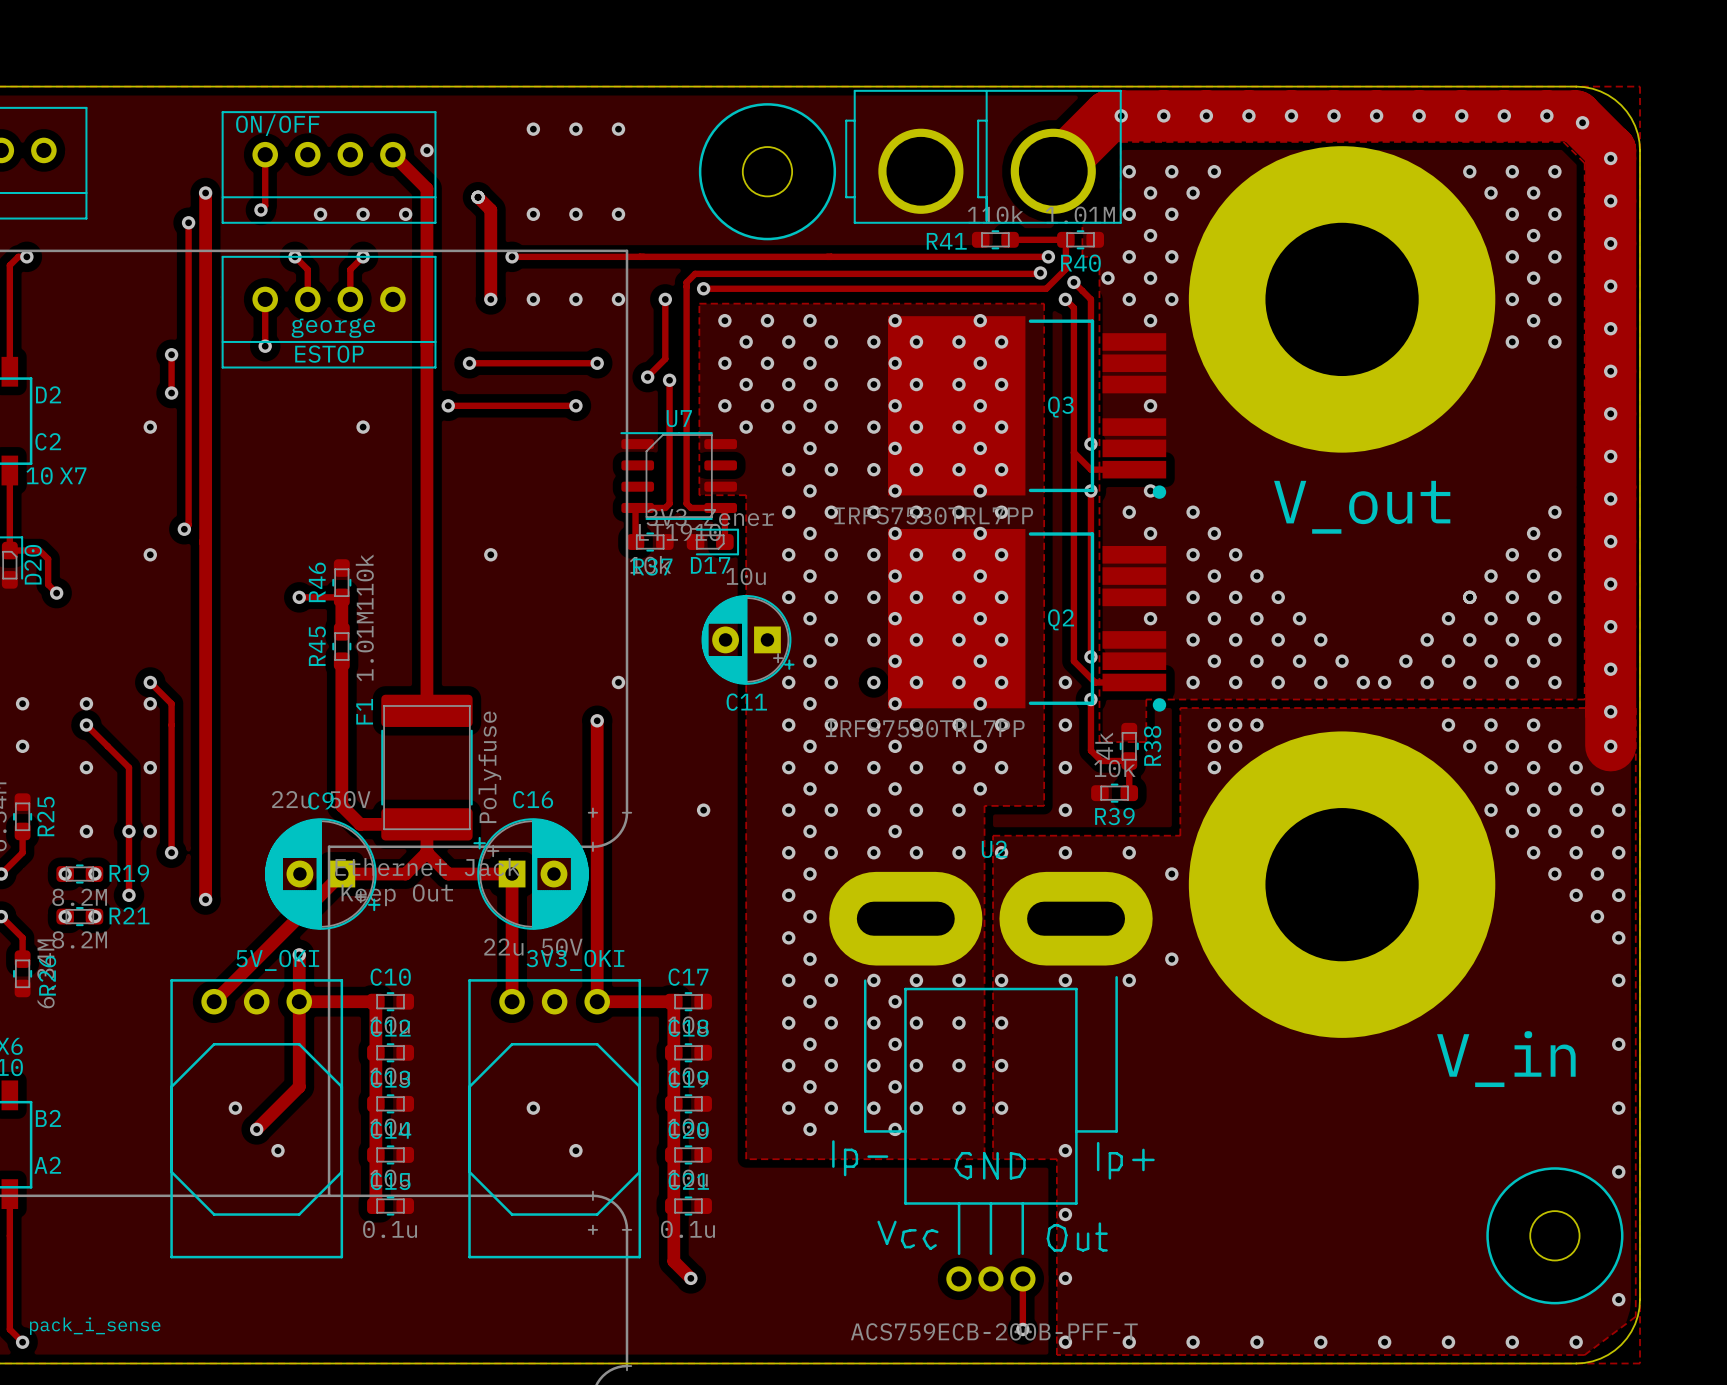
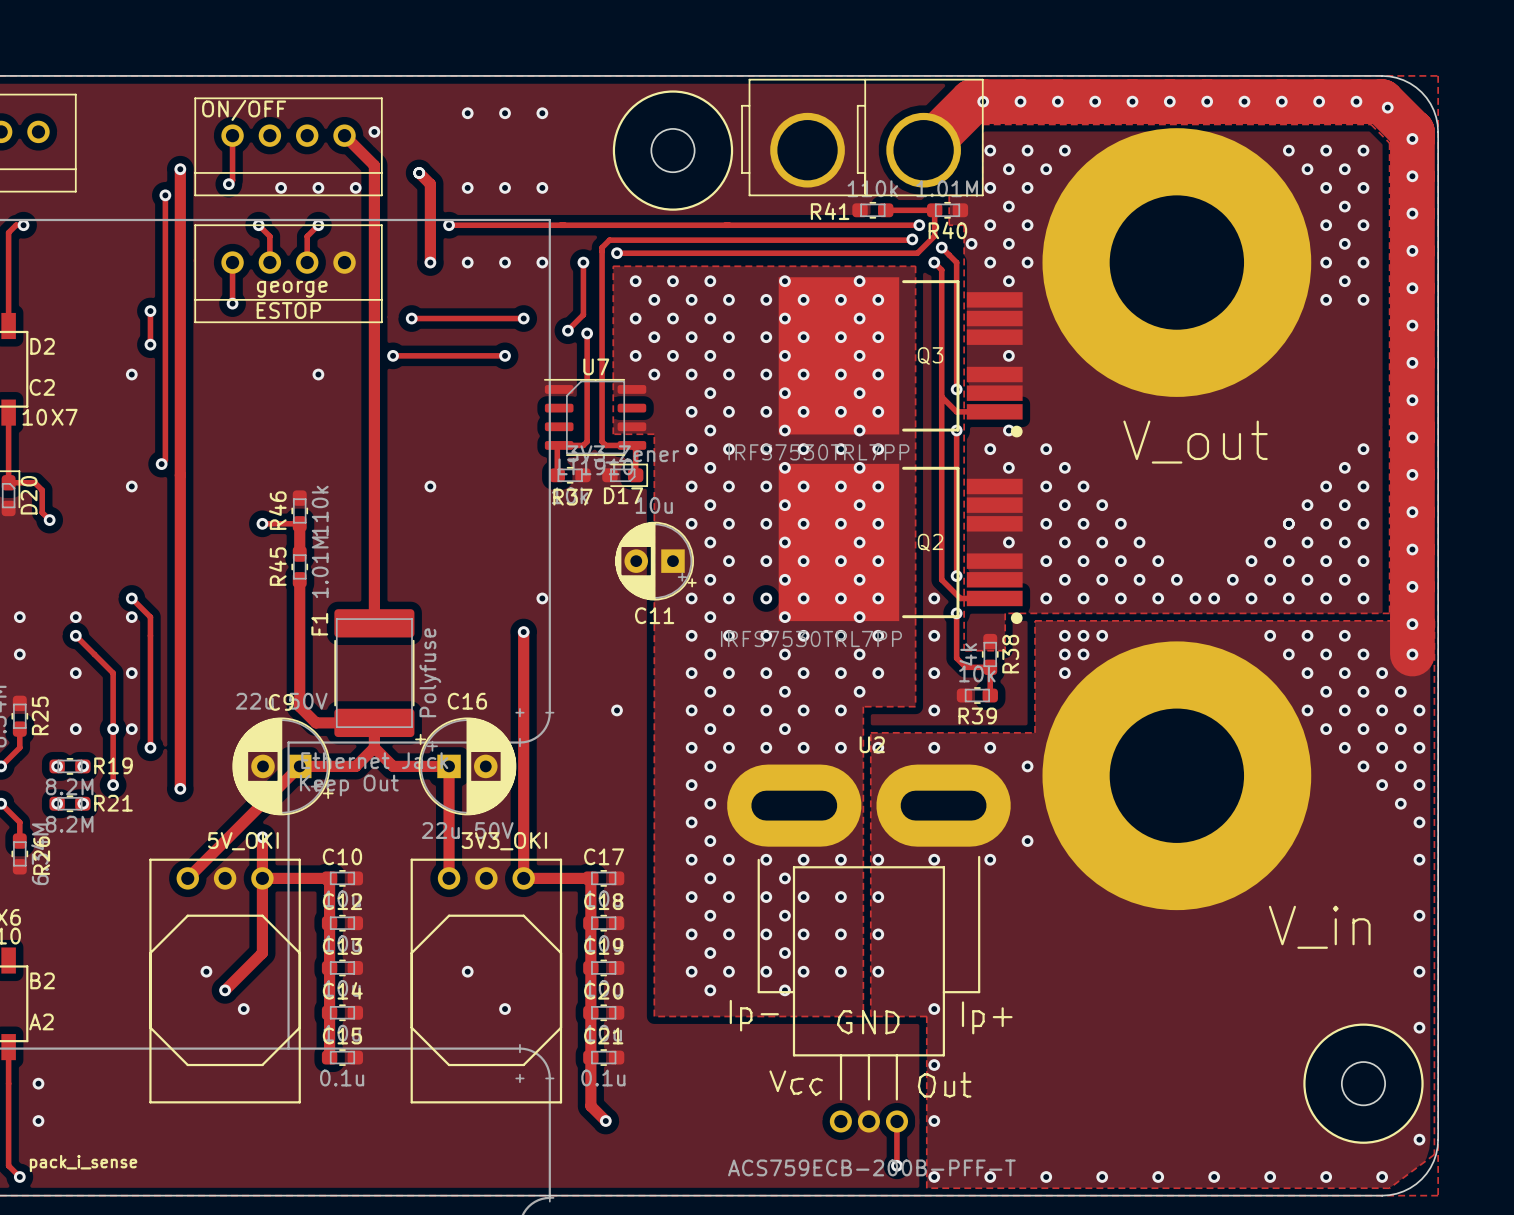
via: none -> (38, 1083)
via: none -> (38, 1121)

